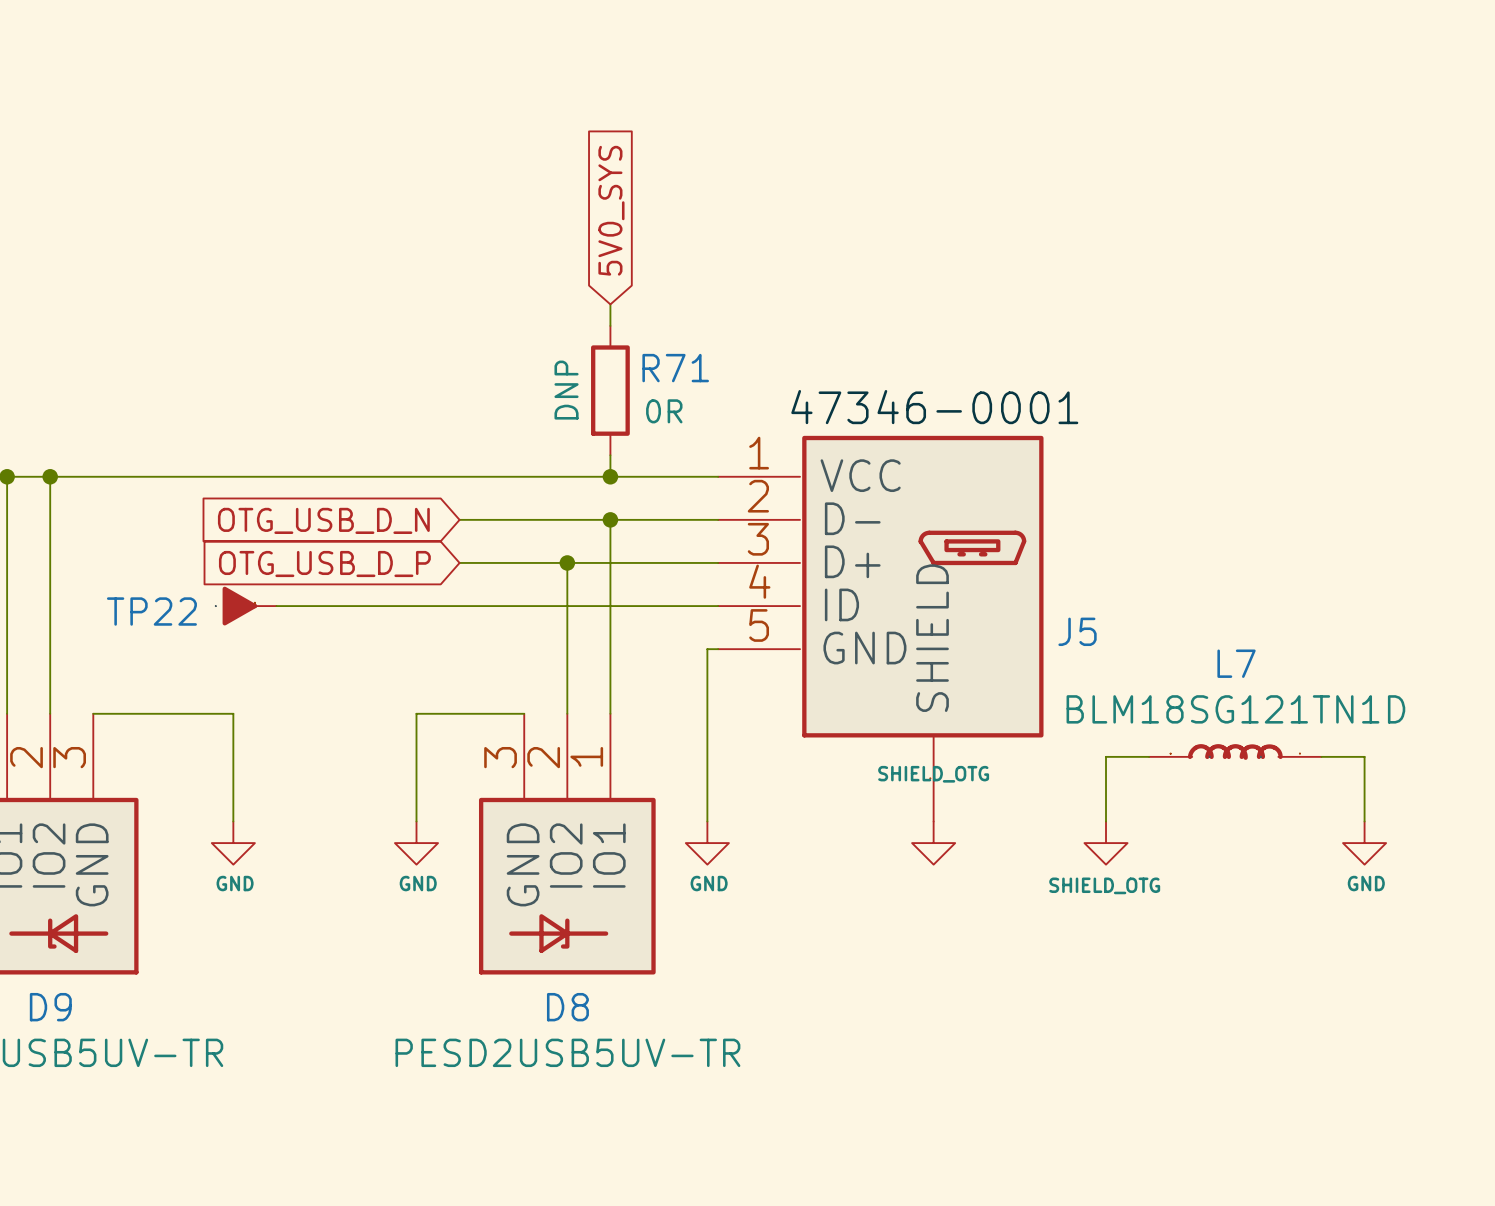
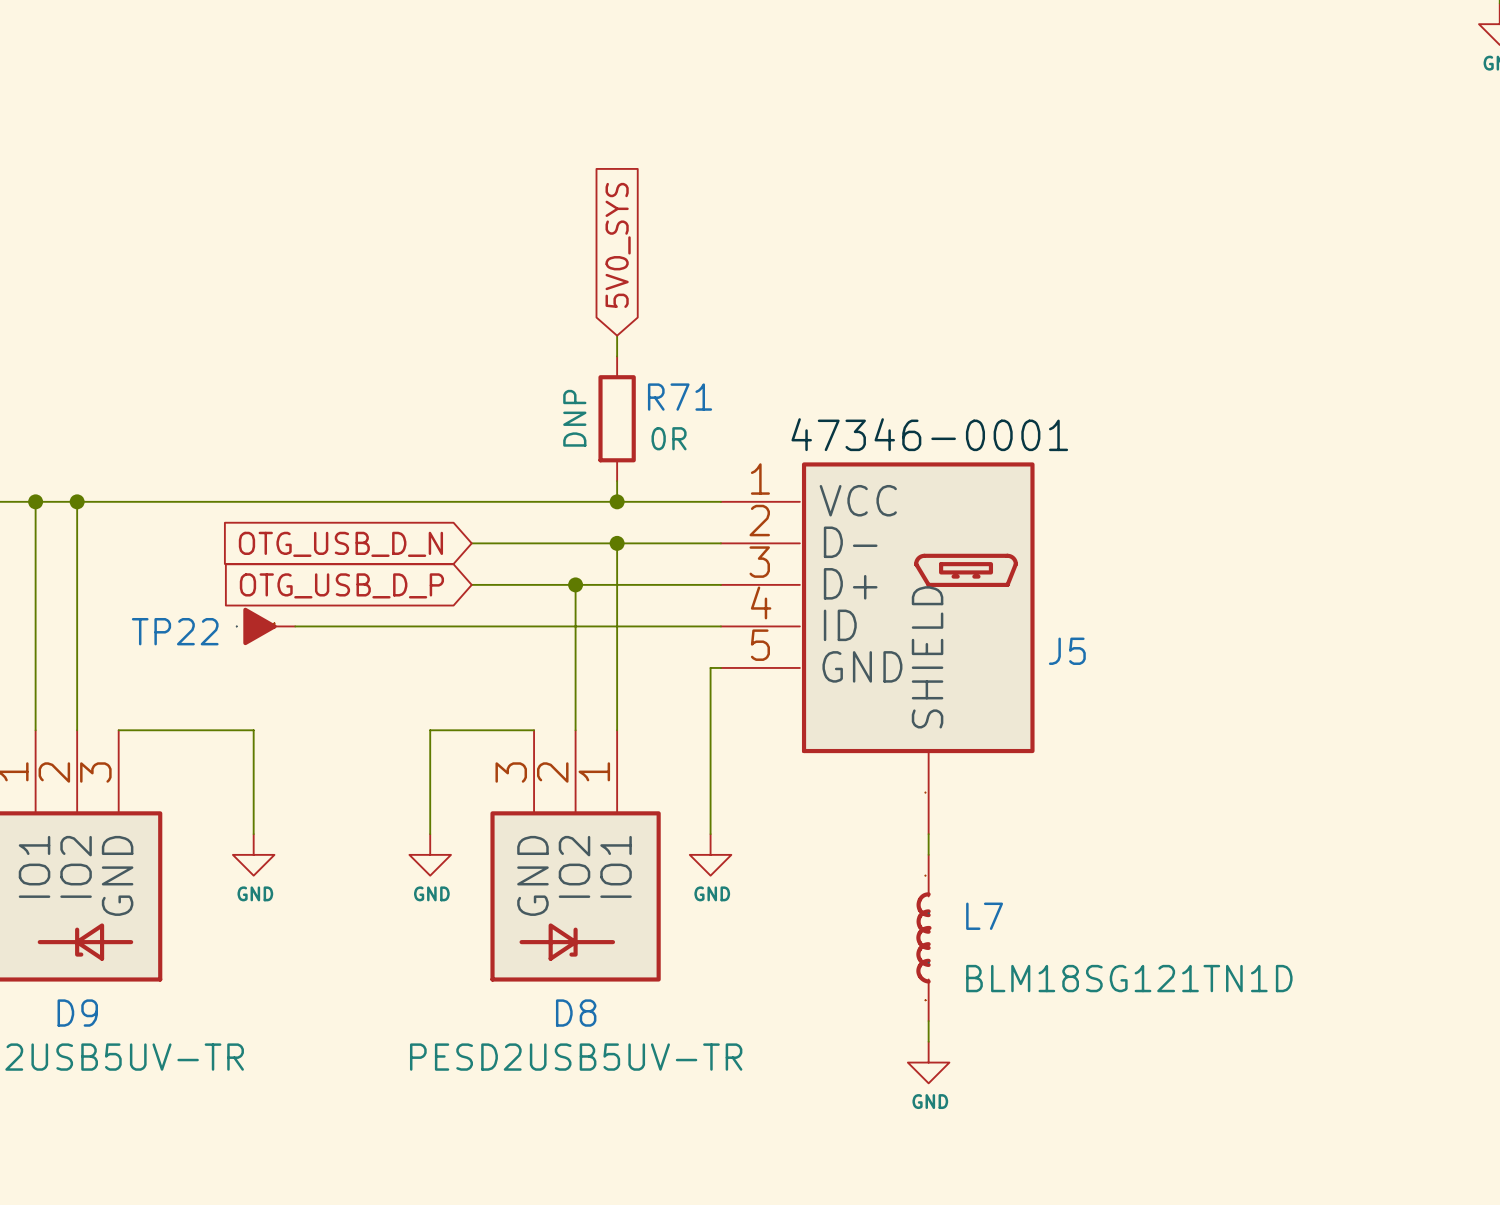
L7 name position: L7 (1236, 663) -> L7 (984, 916)
L7 value position: BLM18SG121TN1D (1235, 709) -> BLM18SG121TN1D (1129, 978)
L7 rotation: 0° (1235, 752) -> 90° counterclockwise (923, 937)
L7 position: (1235, 752) -> (923, 937)
wire: (1149, 756) (1106, 756) (1106, 821) -> none
wire: (1321, 756) (1364, 756) (1364, 821) -> none
power symbol: SHIELD_OTG (933, 843) -> none
power symbol: SHIELD_OTG (1106, 843) -> none
power symbol: GND (1364, 843) -> none
wire: none -> (928, 1021) (928, 1041)
power symbol: none -> GND (928, 1062)

